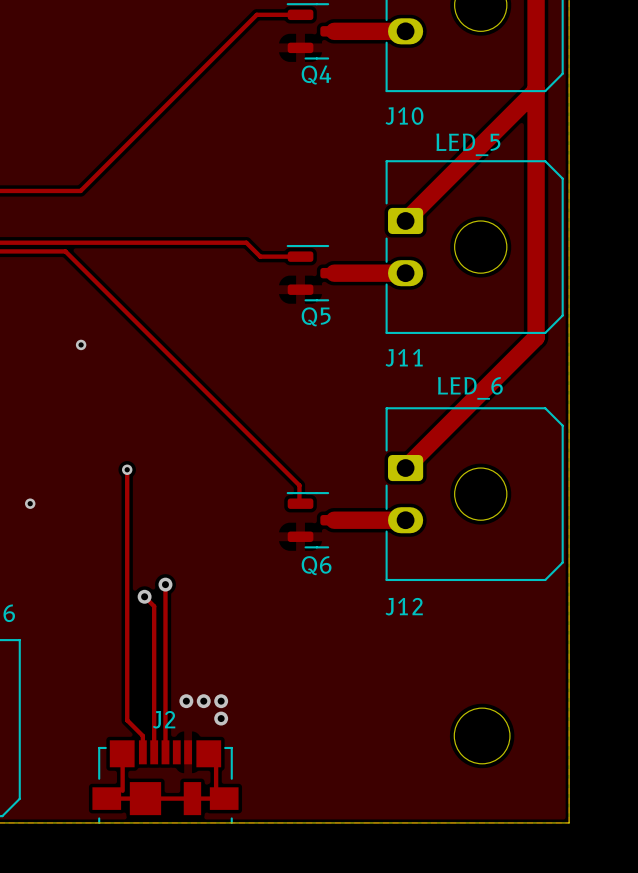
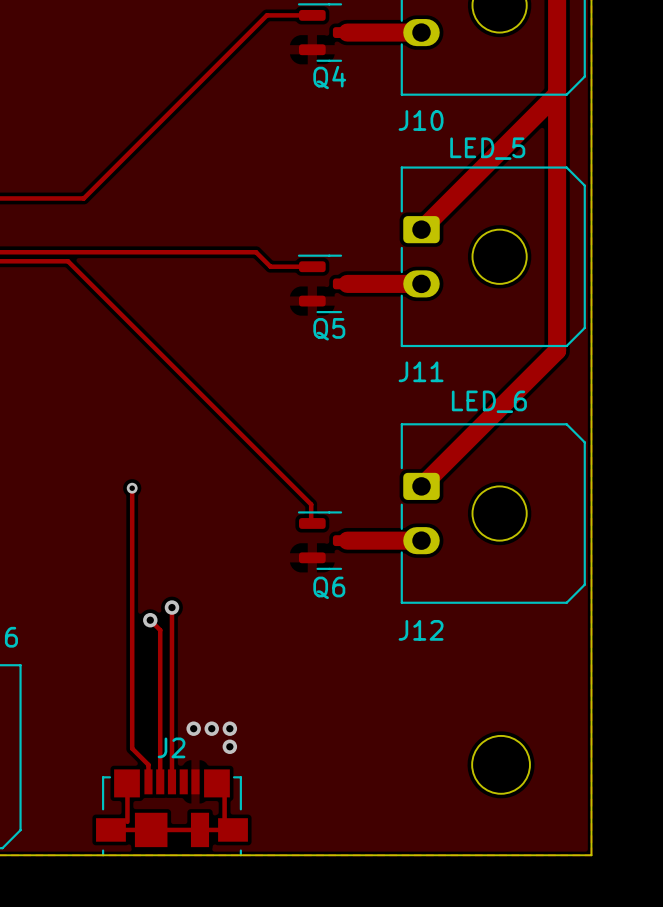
via: (81, 344) -> none
via: (30, 503) -> none

